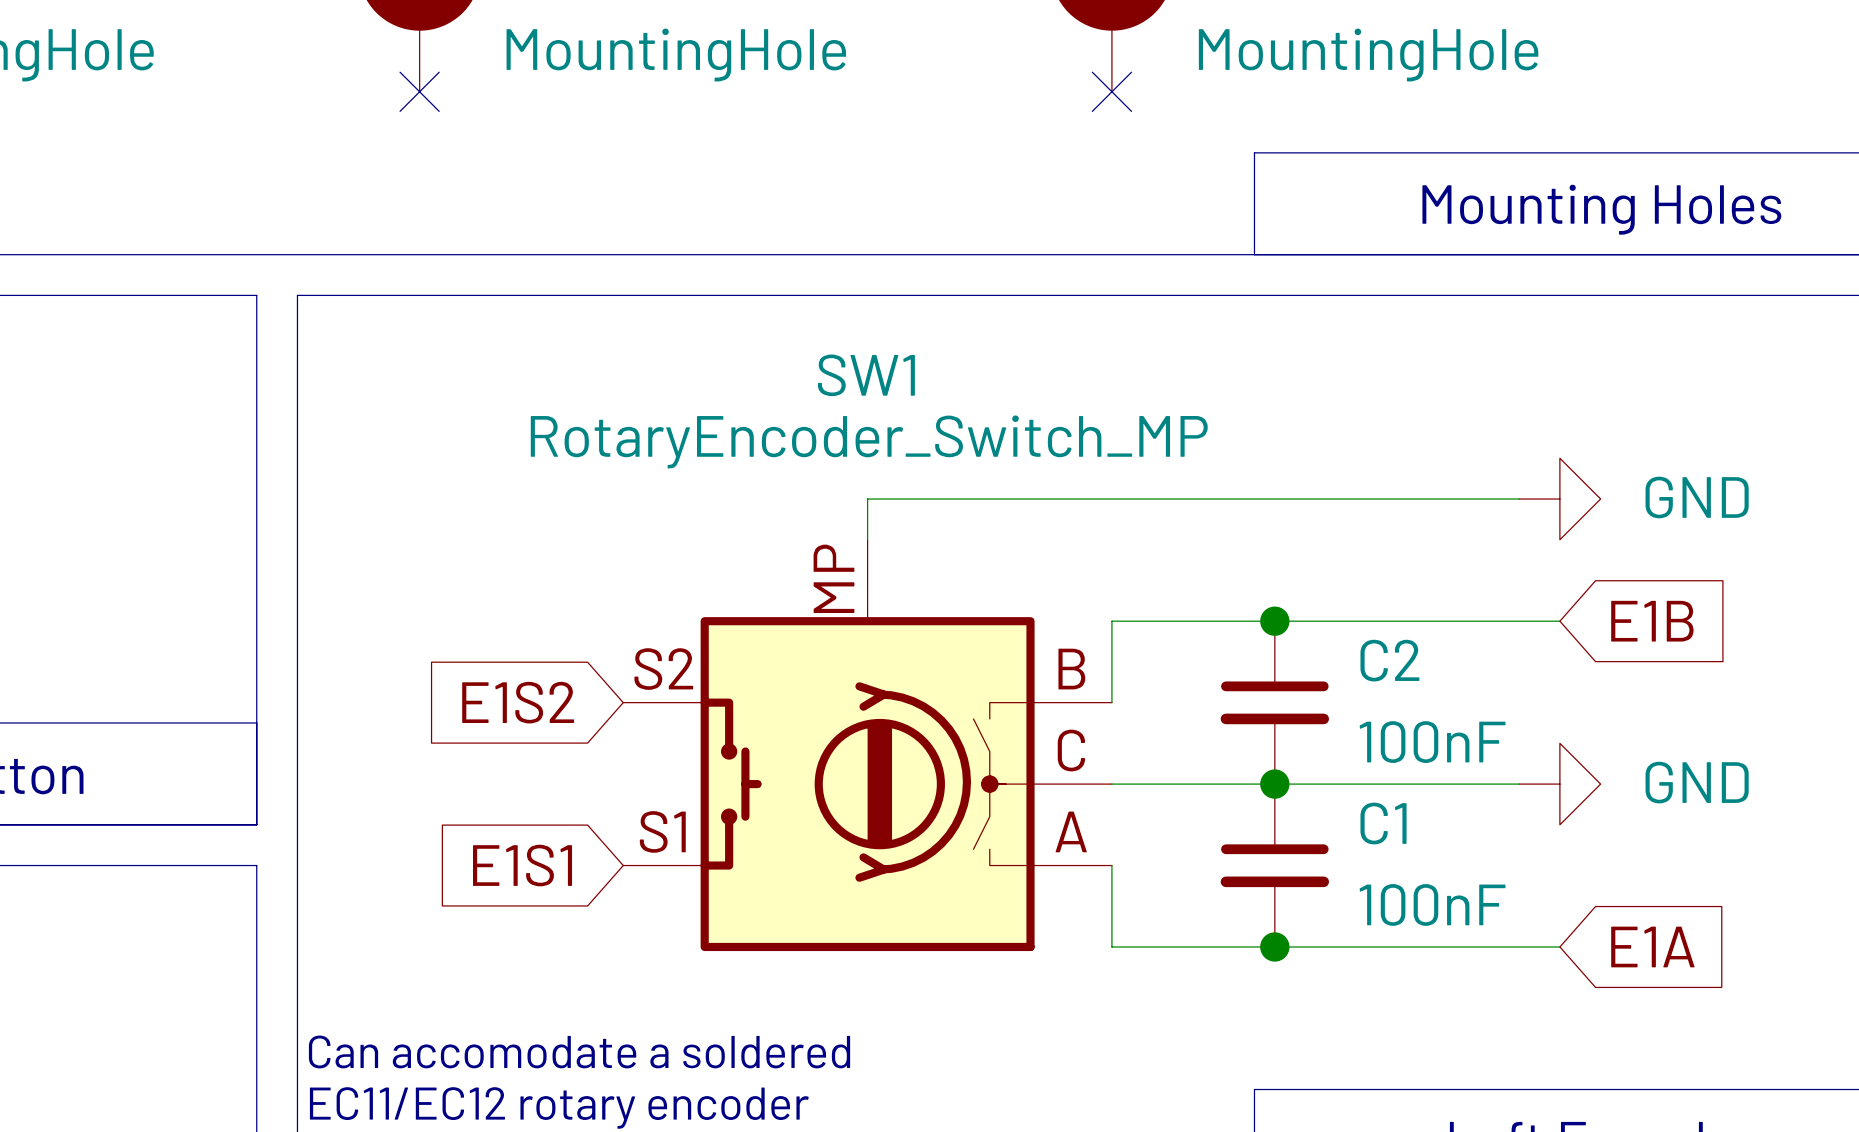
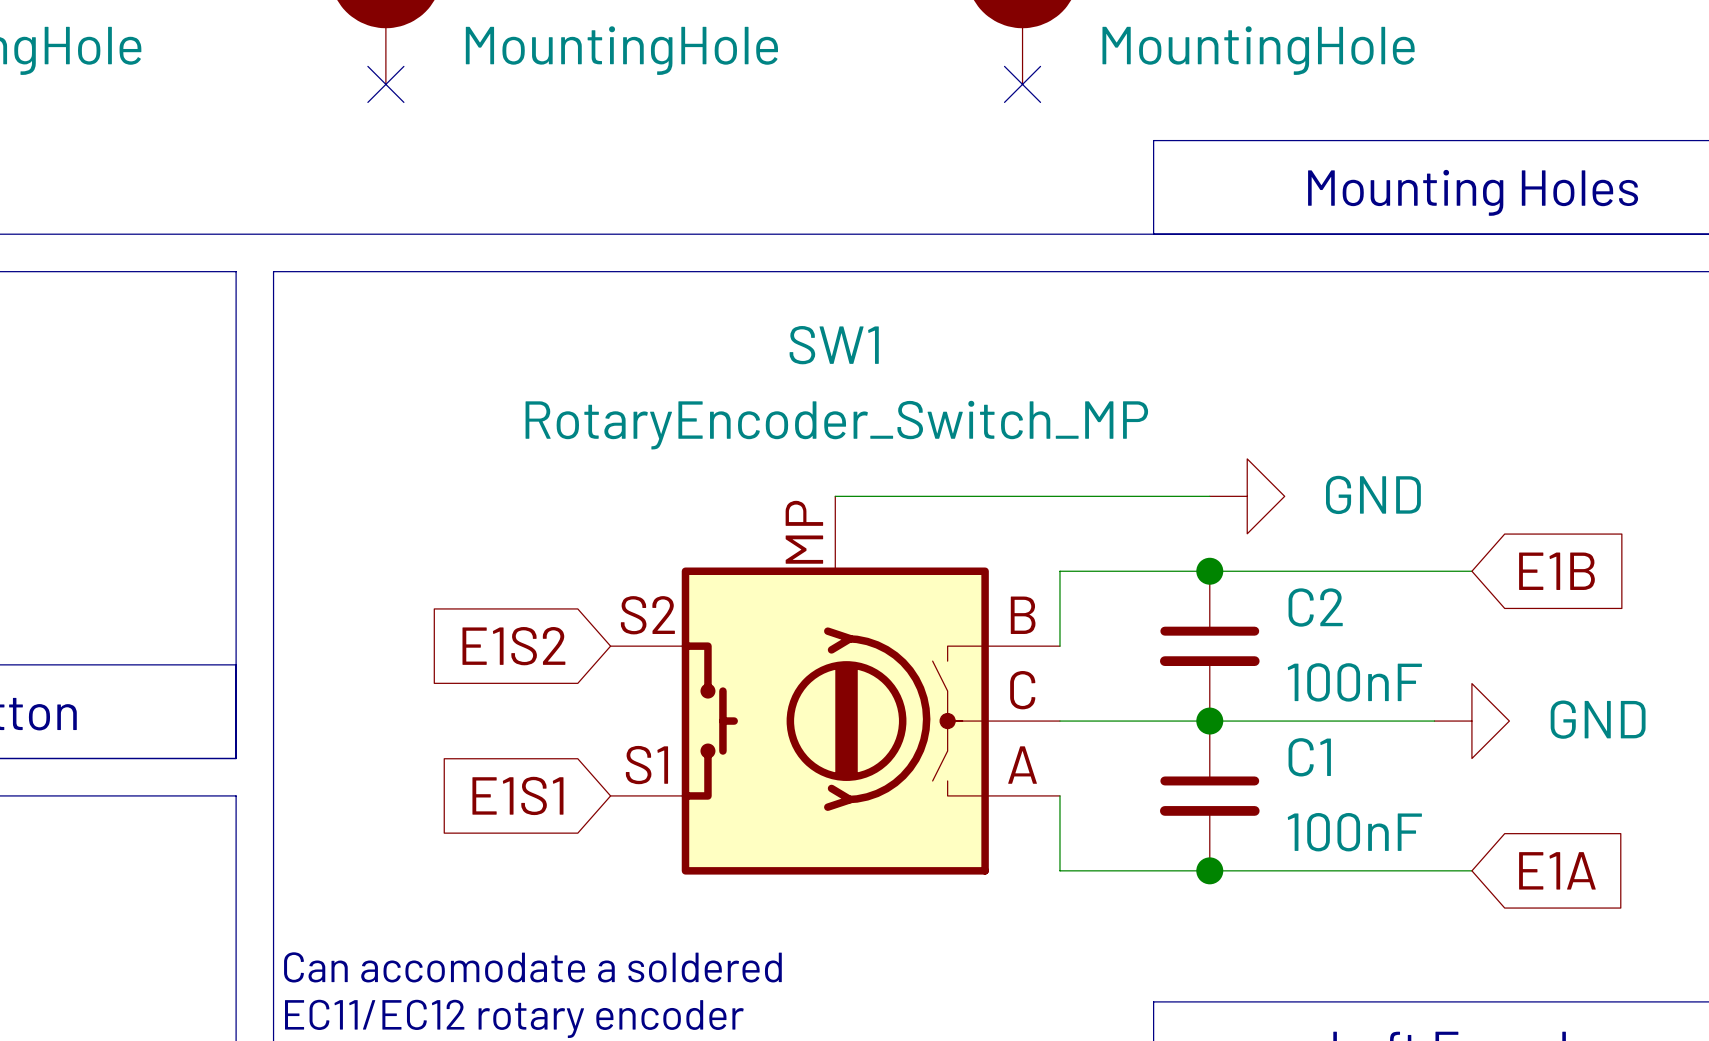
SW1 value position: RotaryEncoder_Switch_MP (869, 441) -> RotaryEncoder_Switch_MP (836, 425)
wire: (1519, 499) (867, 499) (867, 539) -> none
power symbol: GND (1559, 499) -> none
wire: none -> (835, 496) (1209, 496)
power symbol: none -> GND (1247, 496)
wire: (1152, 621) (1111, 621) (1111, 702) -> (1059, 571) (1059, 646)
junction position: (1274, 621) -> (1209, 571)
wire: none -> (1434, 571) (1471, 571)
global label position: E1B (1652, 621) -> E1B (1556, 571)
global label position: E1S2 (518, 702) -> E1S2 (513, 646)
C2 position: (1274, 702) -> (1209, 646)
SW1 position: (867, 745) -> (835, 685)
junction position: (1274, 784) -> (1209, 721)
power symbol position: GND (1559, 784) -> GND (1471, 721)
global label position: E1S1 (522, 865) -> E1S1 (517, 795)
wire: (1111, 865) (1111, 946) (1152, 946) -> (1059, 795) (1059, 870)
C1 position: (1274, 865) -> (1209, 795)
junction position: (1274, 946) -> (1209, 870)
wire: none -> (1434, 870) (1471, 870)
global label position: E1A (1652, 946) -> E1A (1557, 870)

